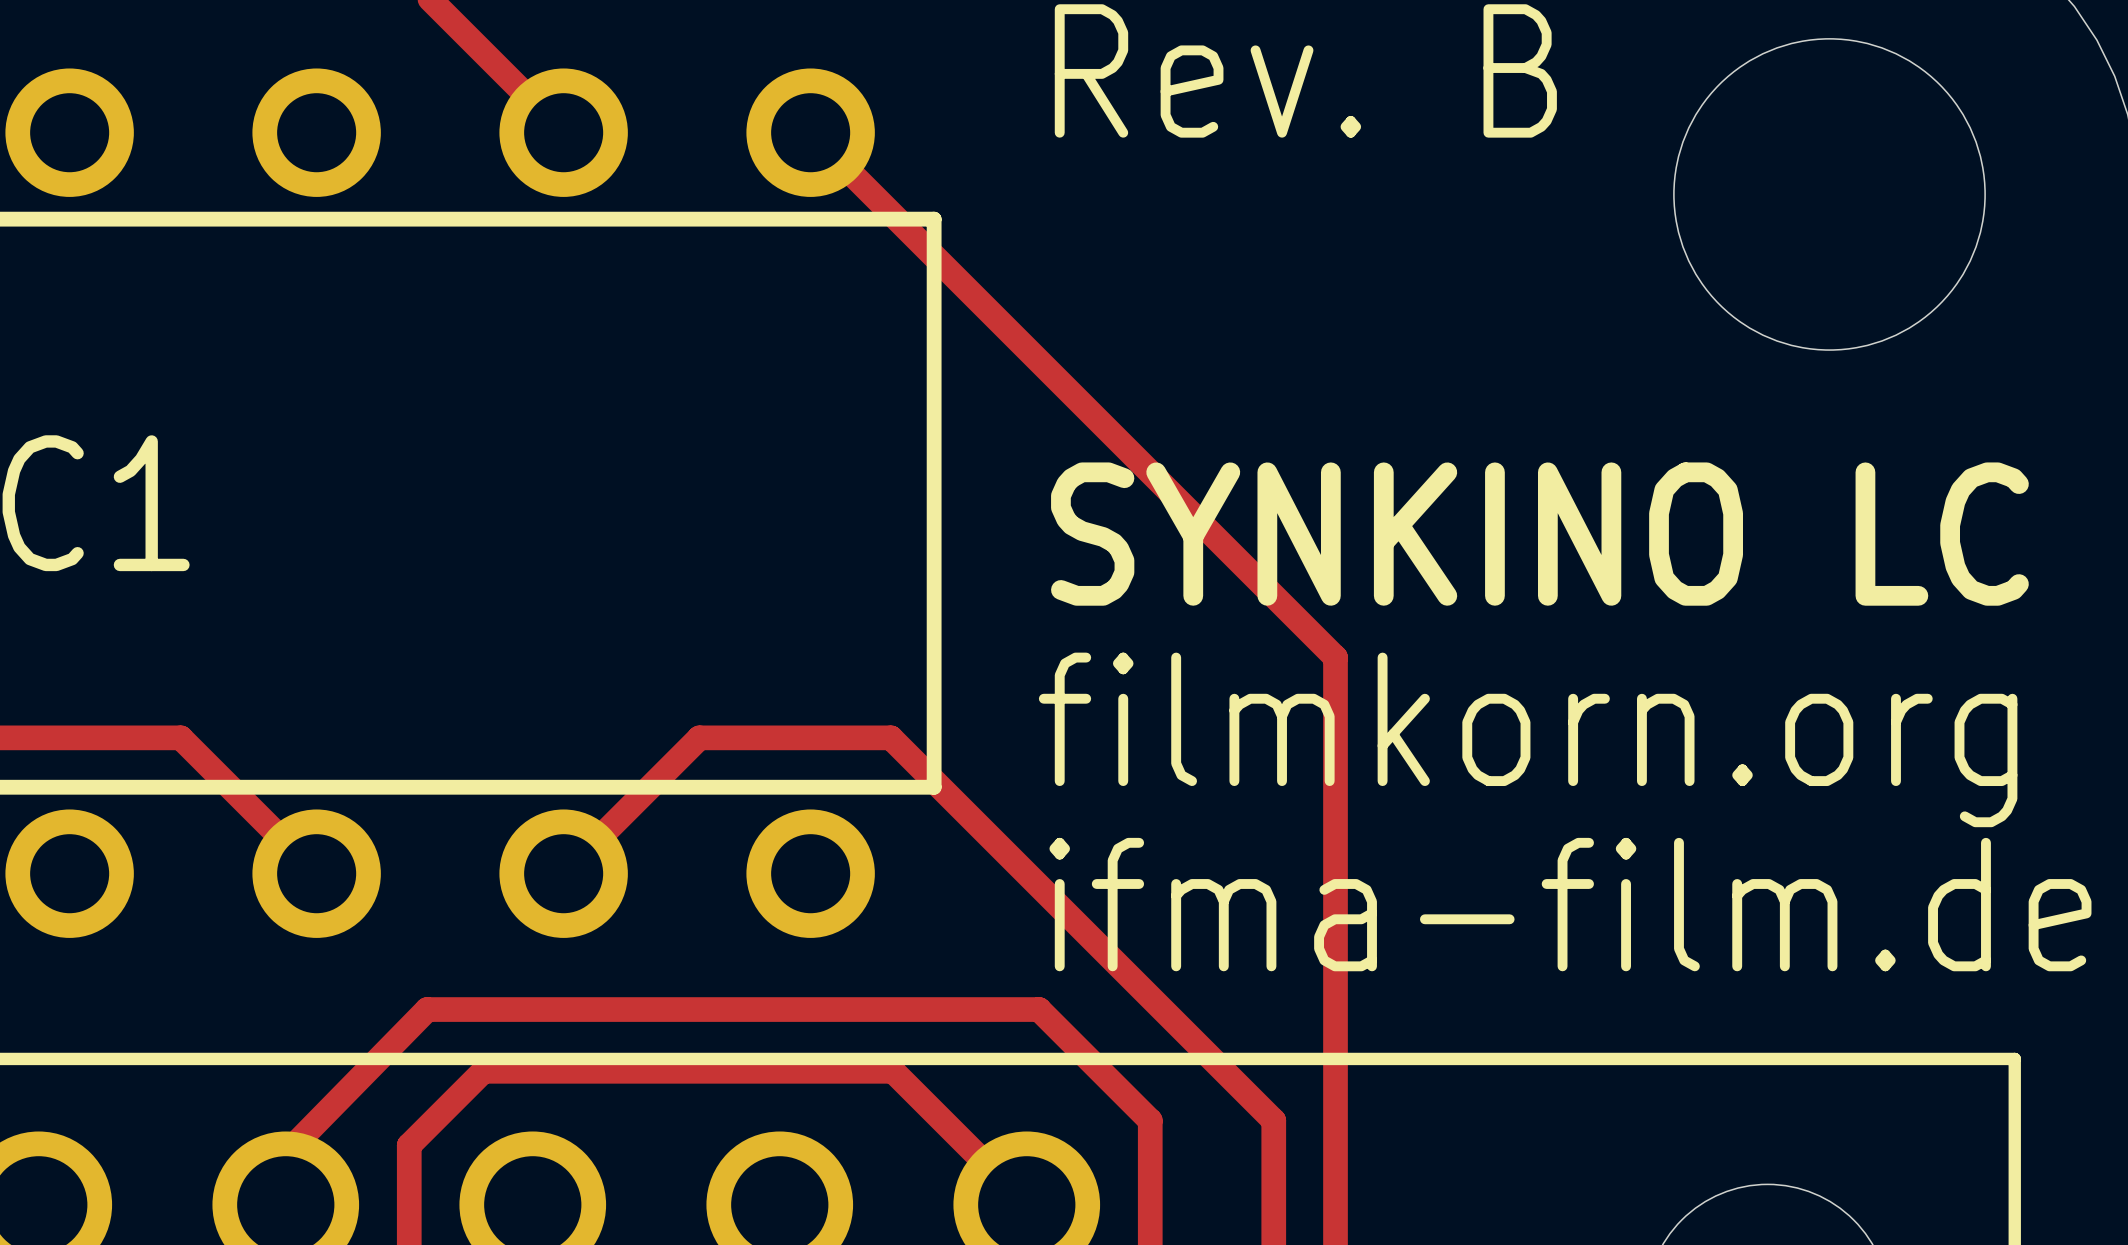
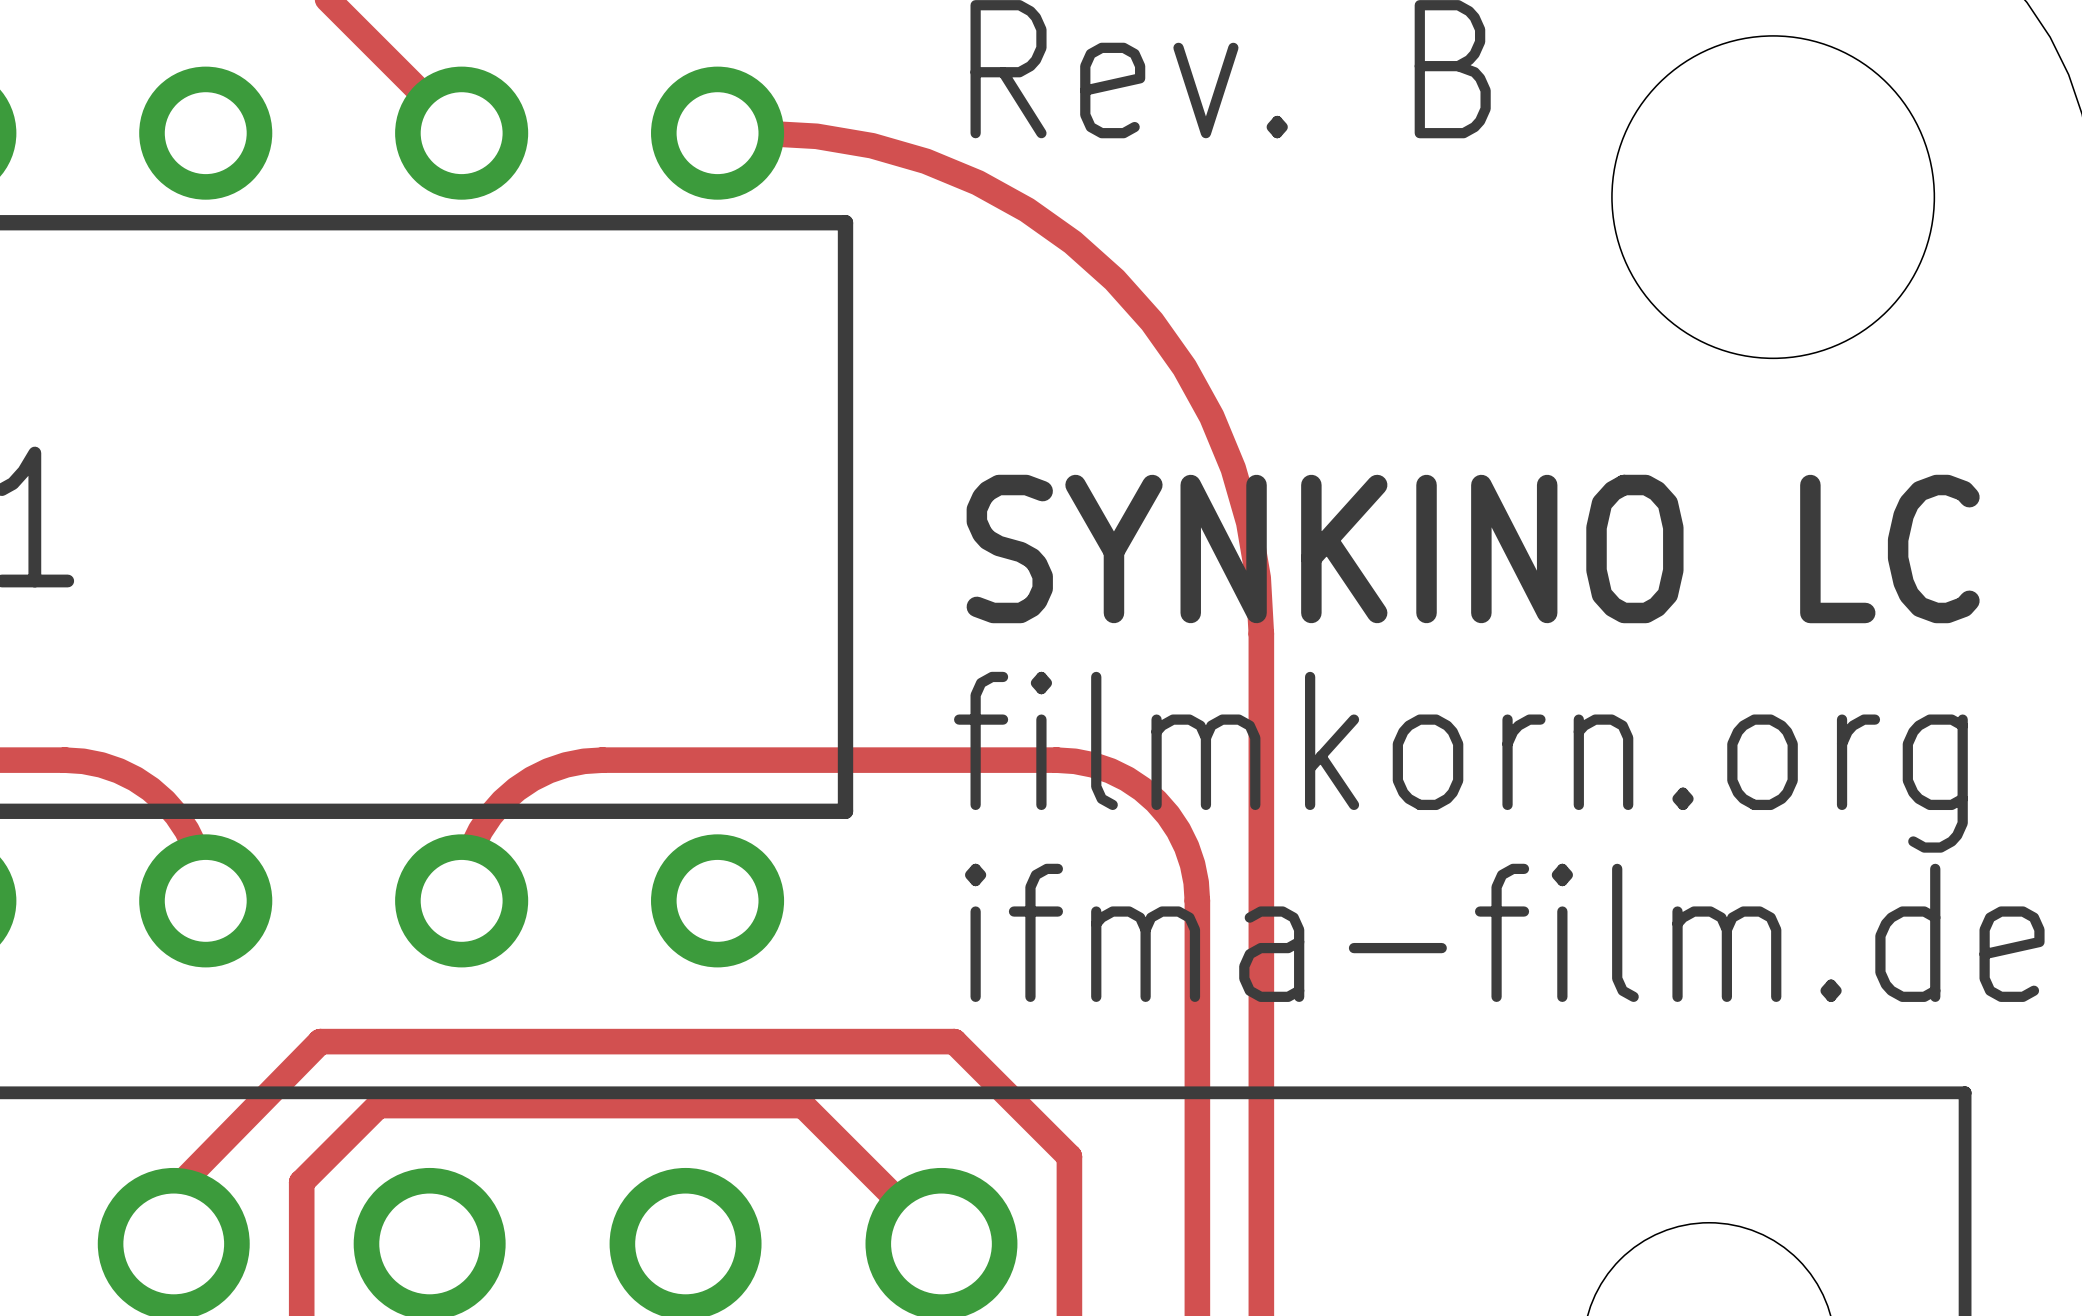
top track: (810, 132) (1335, 657) -> (717, 133) (816, 136) (871, 145) (925, 161) (977, 182) (1026, 209) (1072, 242) (1114, 279) (1152, 321) (1184, 367) (1211, 416) (1233, 468) (1248, 522) (1258, 577) (1261, 676)
top track: (180, 737) (316, 873) -> (64, 760) (83, 761) (118, 770) (135, 778) (164, 801) (186, 830) (195, 847) (200, 864) (205, 900)
top track: (699, 737) (563, 873) -> (602, 760) (565, 764) (548, 770) (516, 789) (502, 801) (490, 815) (472, 847) (466, 864) (461, 900)
top track: (890, 737) (1273, 1120) -> (800, 760) (1074, 761) (1110, 770) (1126, 778) (1156, 801) (1168, 815) (1186, 847) (1196, 882) (1197, 1156)

